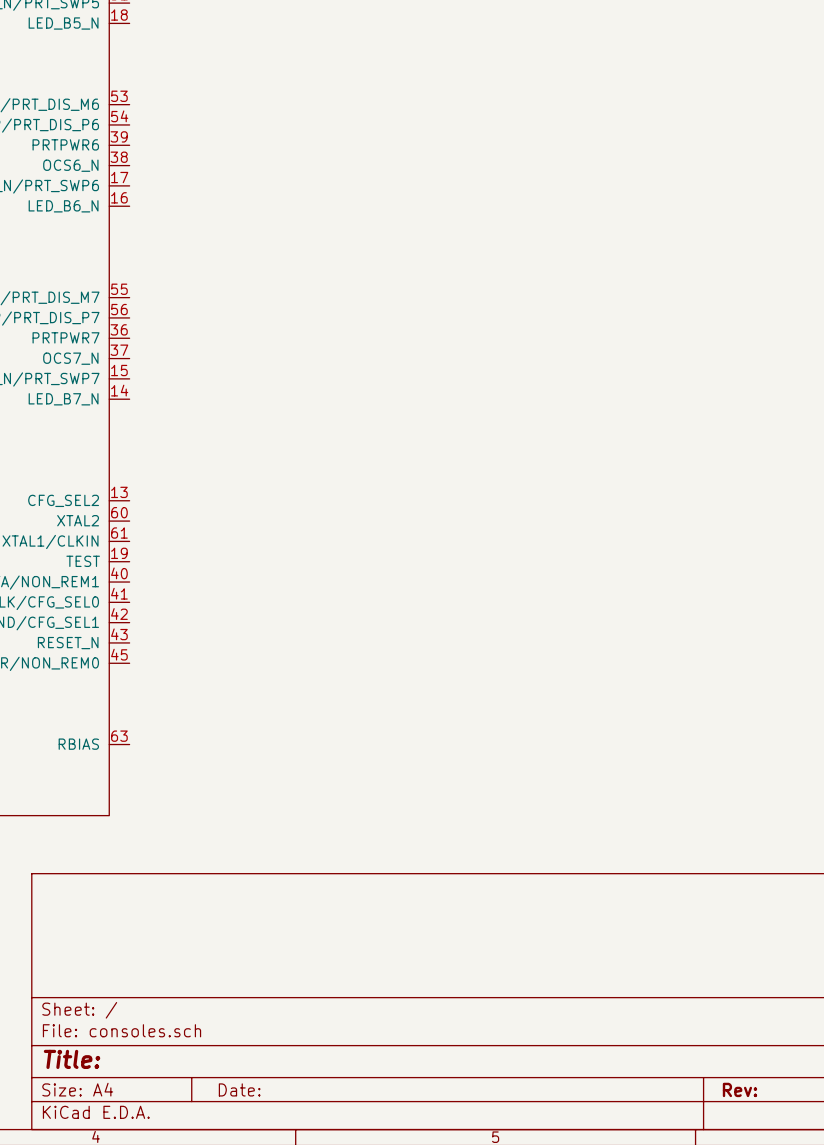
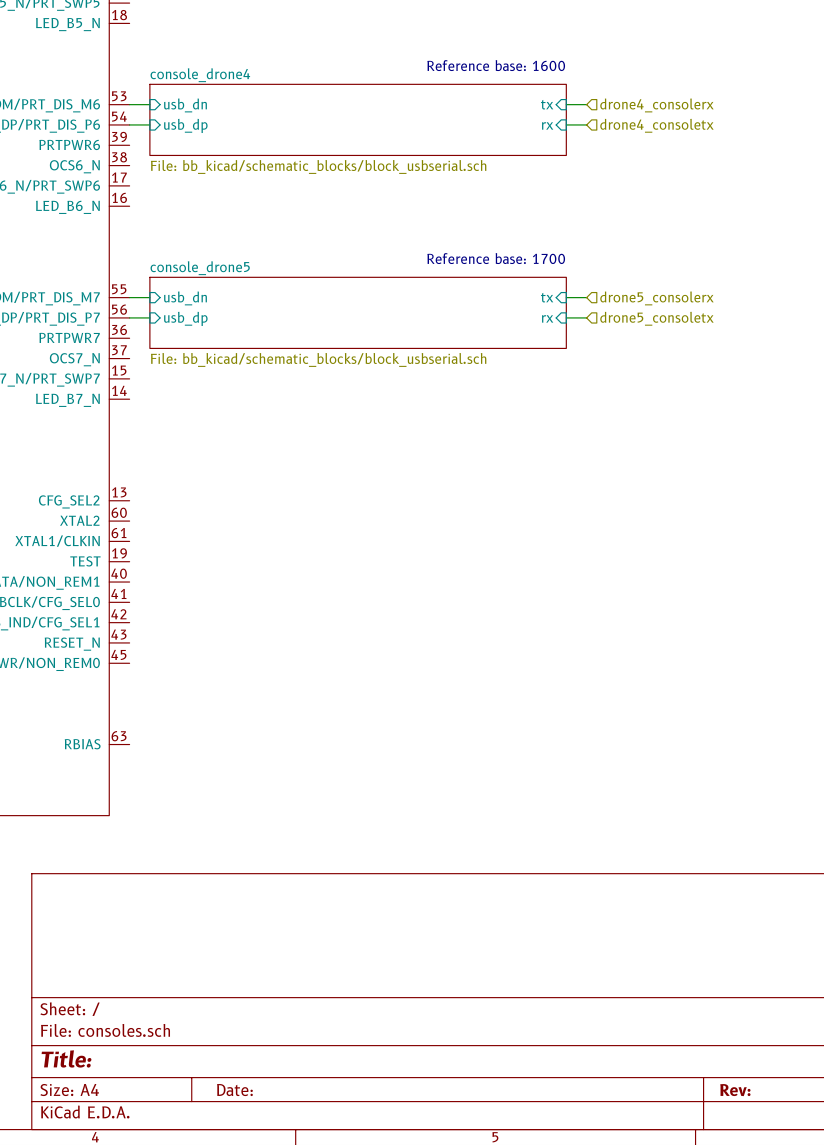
text: none -> Reference base: 1600 (496, 65)
wire: none -> (129, 104) (149, 104)
sheet pin: none -> usb_dn (185, 105)
sheet pin: none -> tx (547, 104)
wire: none -> (566, 104) (586, 104)
hierarchical label: none -> drone4_consolerx (656, 105)
sheet console_drone4: none -> File: bb_kicad/schematic_blocks/block_usbserial.sch (358, 119)
wire: none -> (129, 124) (149, 124)
wire: none -> (566, 124) (586, 124)
hierarchical label: none -> drone4_consoletx (656, 125)
sheet pin: none -> usb_dp (185, 125)
sheet pin: none -> rx (547, 125)
text: none -> Reference base: 1700 (496, 258)
wire: none -> (129, 297) (149, 297)
sheet pin: none -> usb_dn (185, 298)
sheet pin: none -> tx (547, 297)
wire: none -> (566, 297) (586, 297)
hierarchical label: none -> drone5_consolerx (656, 298)
sheet console_drone5: none -> File: bb_kicad/schematic_blocks/block_usbserial.sch (358, 312)
wire: none -> (129, 317) (149, 317)
wire: none -> (566, 317) (586, 317)
hierarchical label: none -> drone5_consoletx (656, 318)
sheet pin: none -> usb_dp (185, 318)
sheet pin: none -> rx (547, 318)

